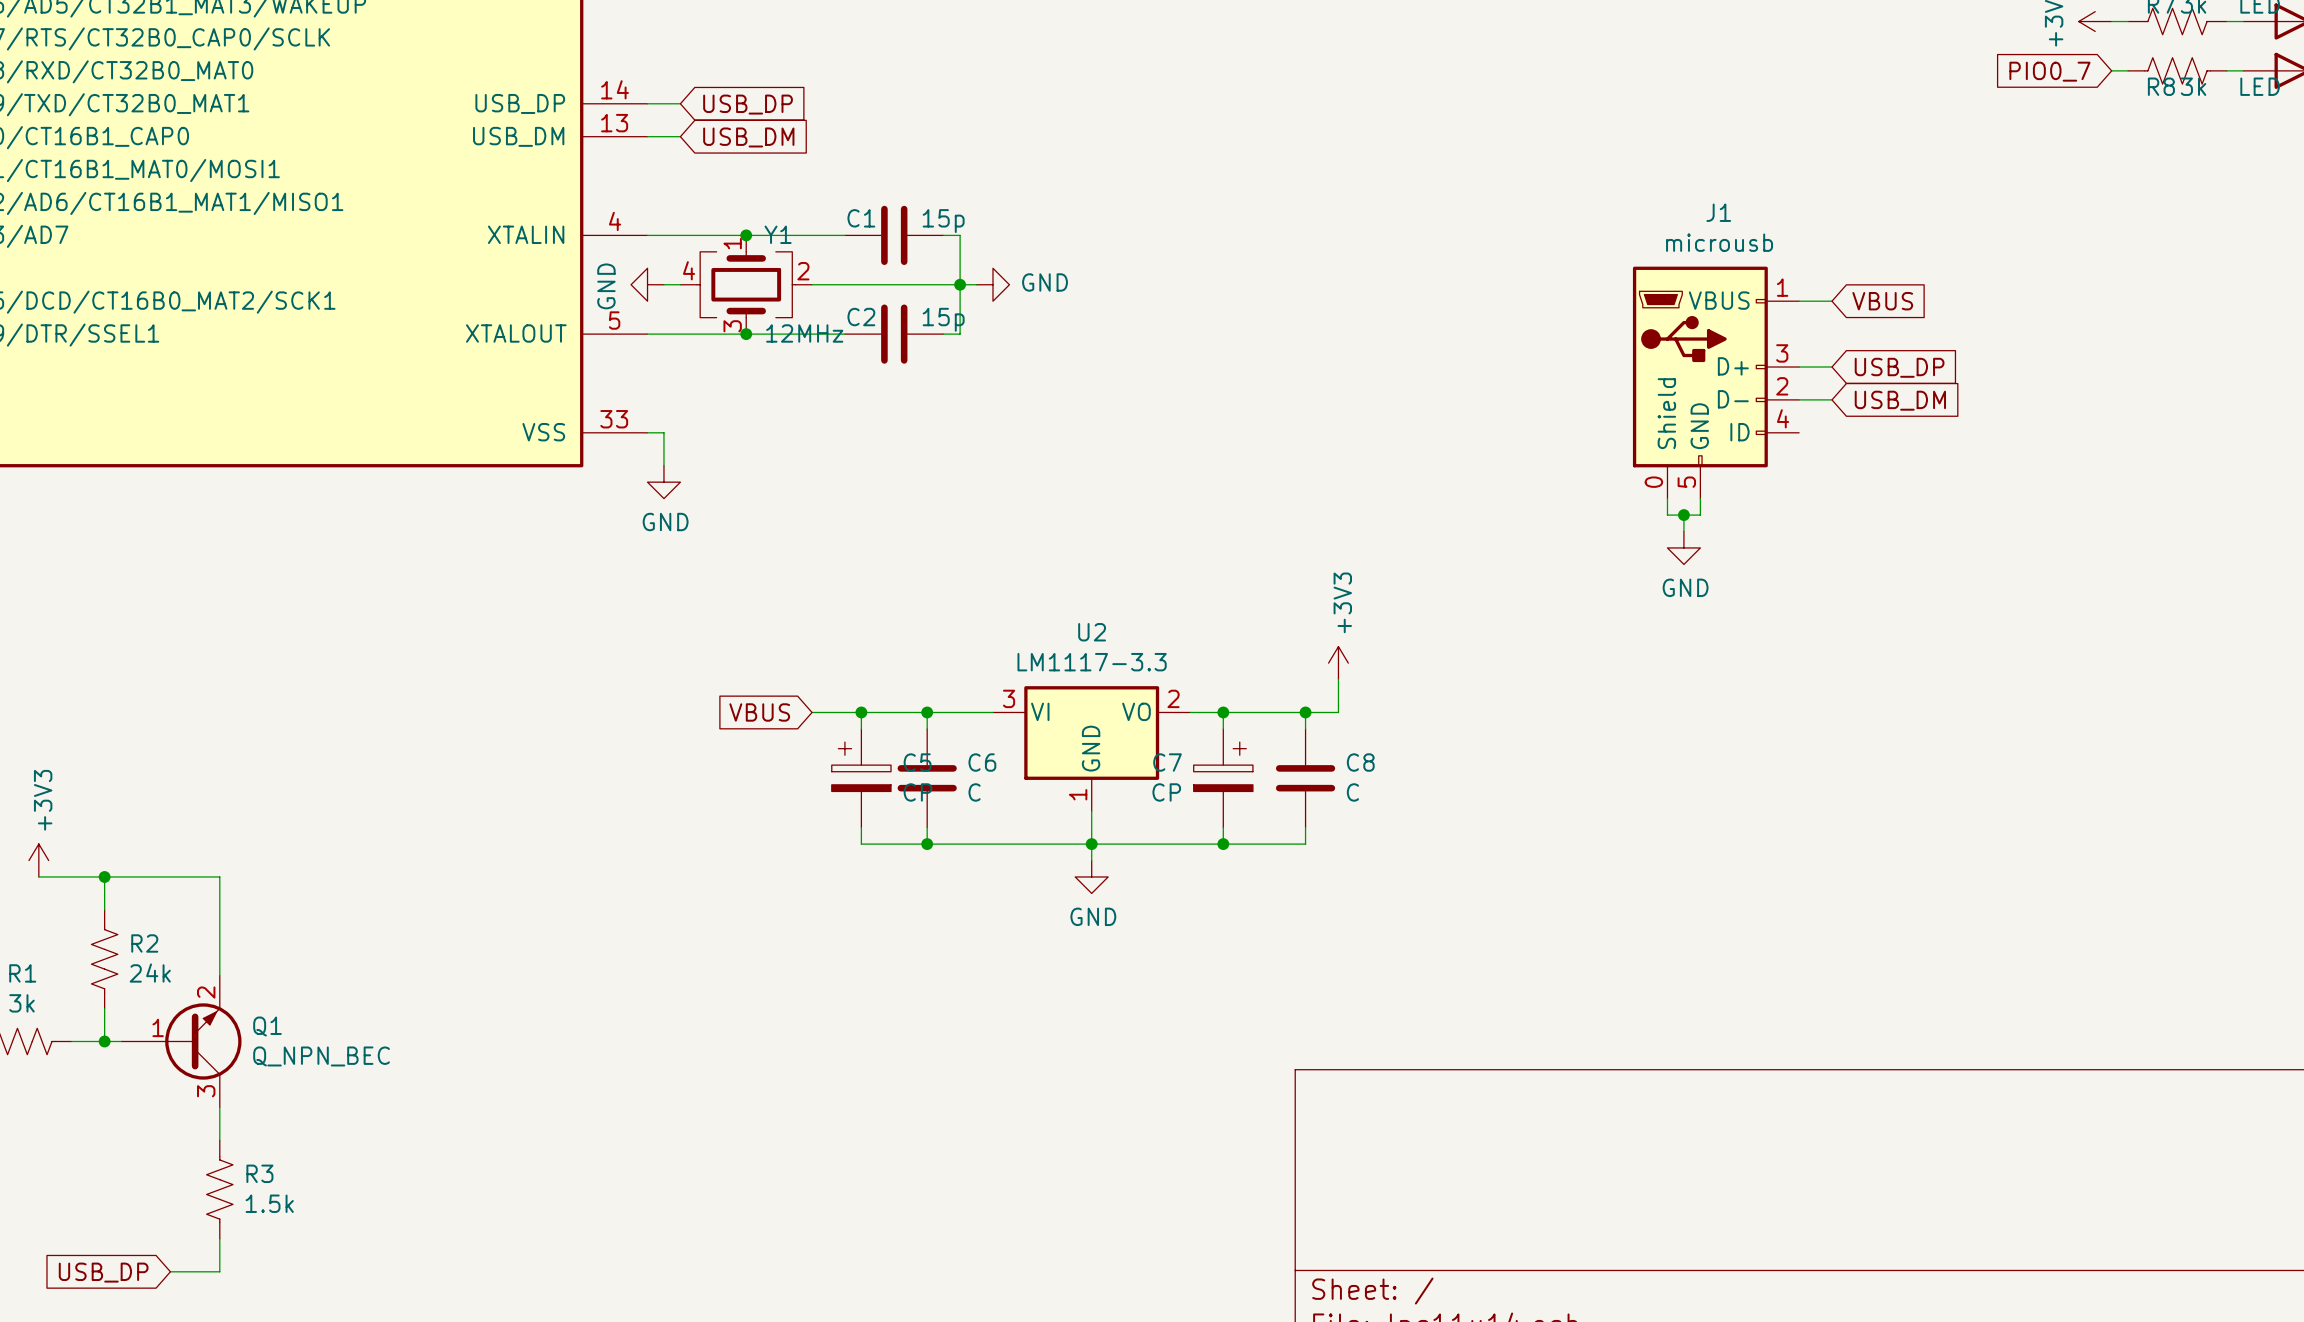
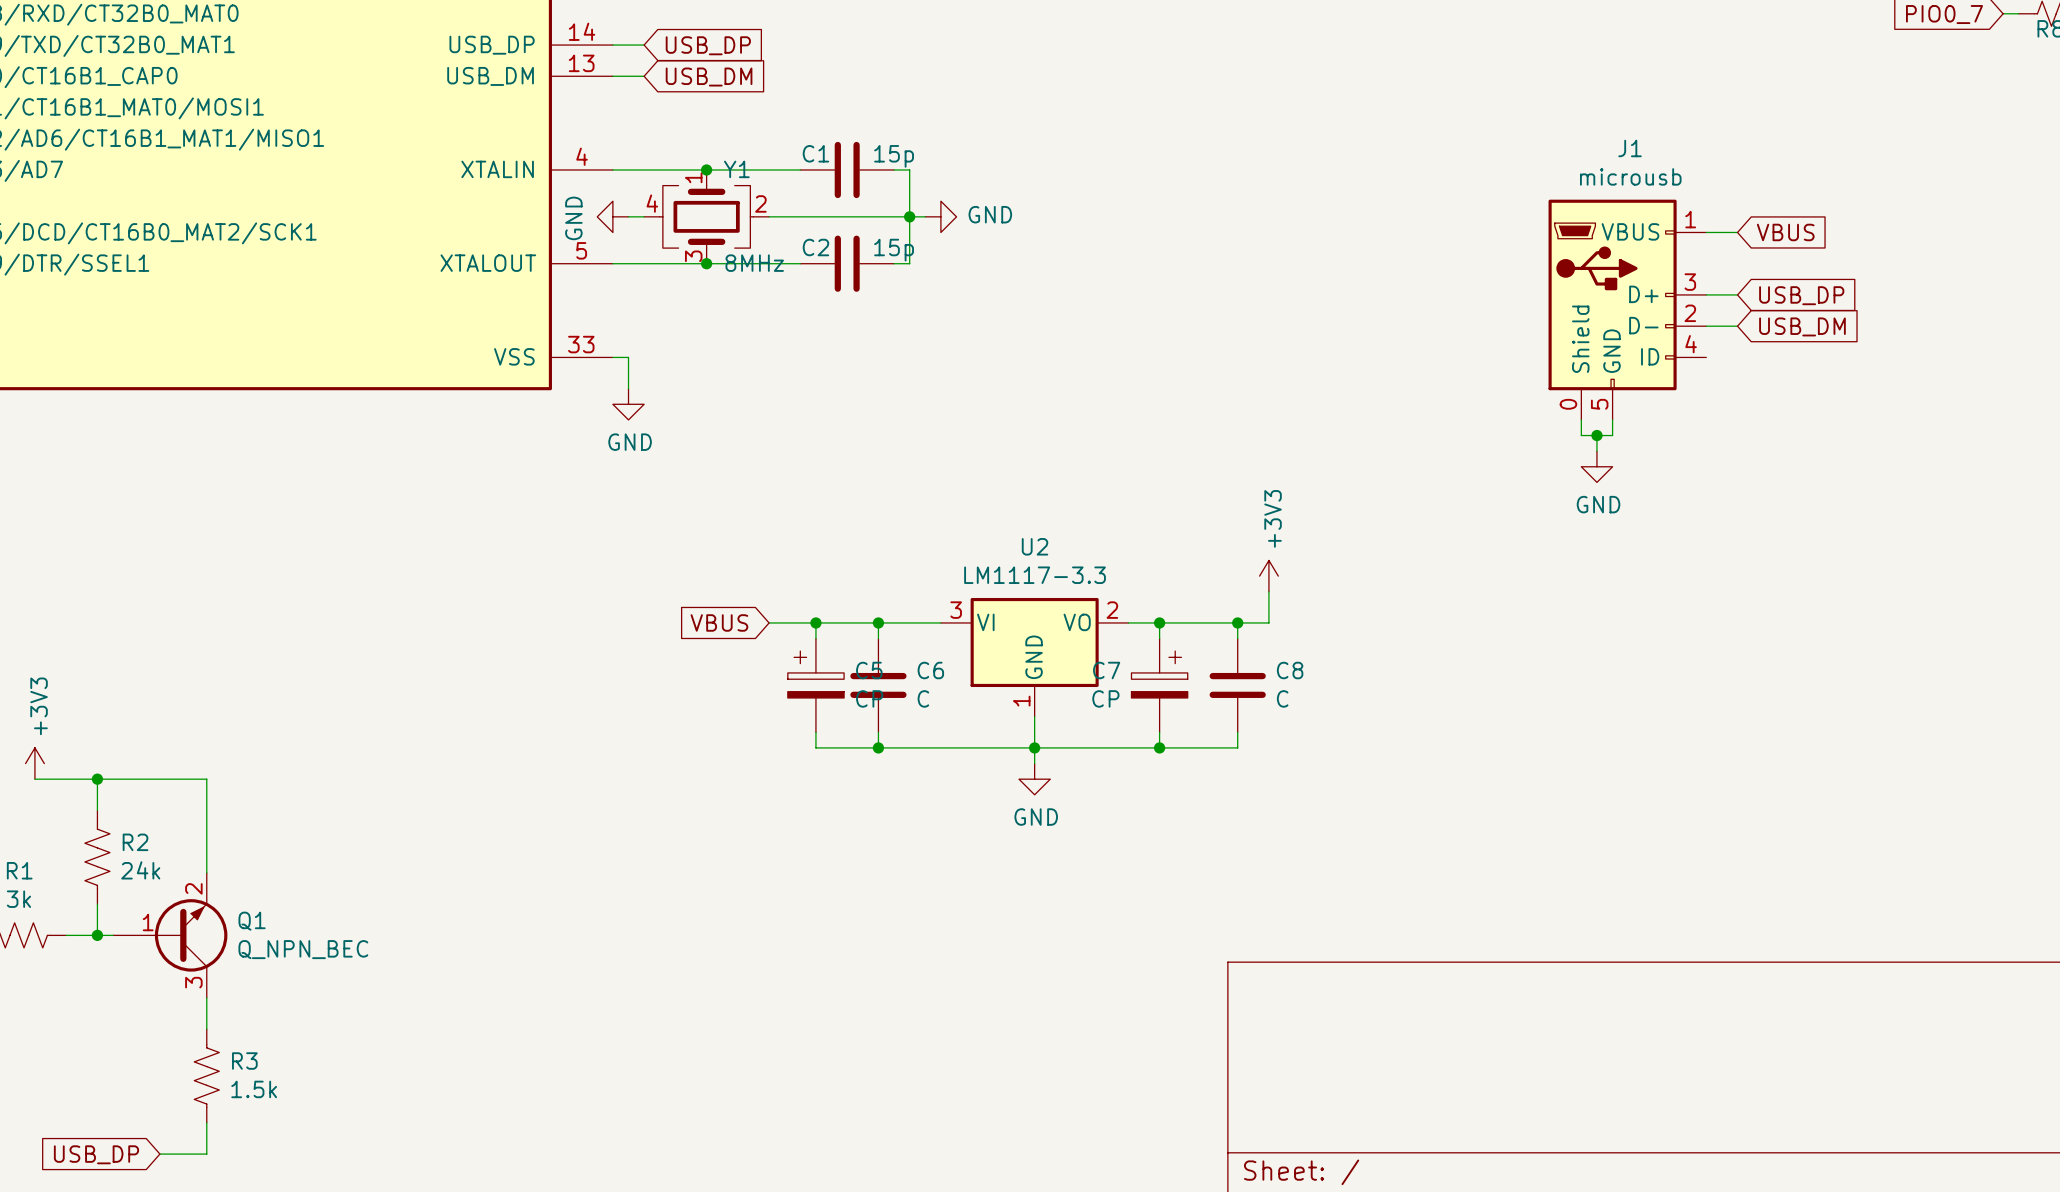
Y1 value: 12MHz (804, 333) -> 8MHz (754, 263)

